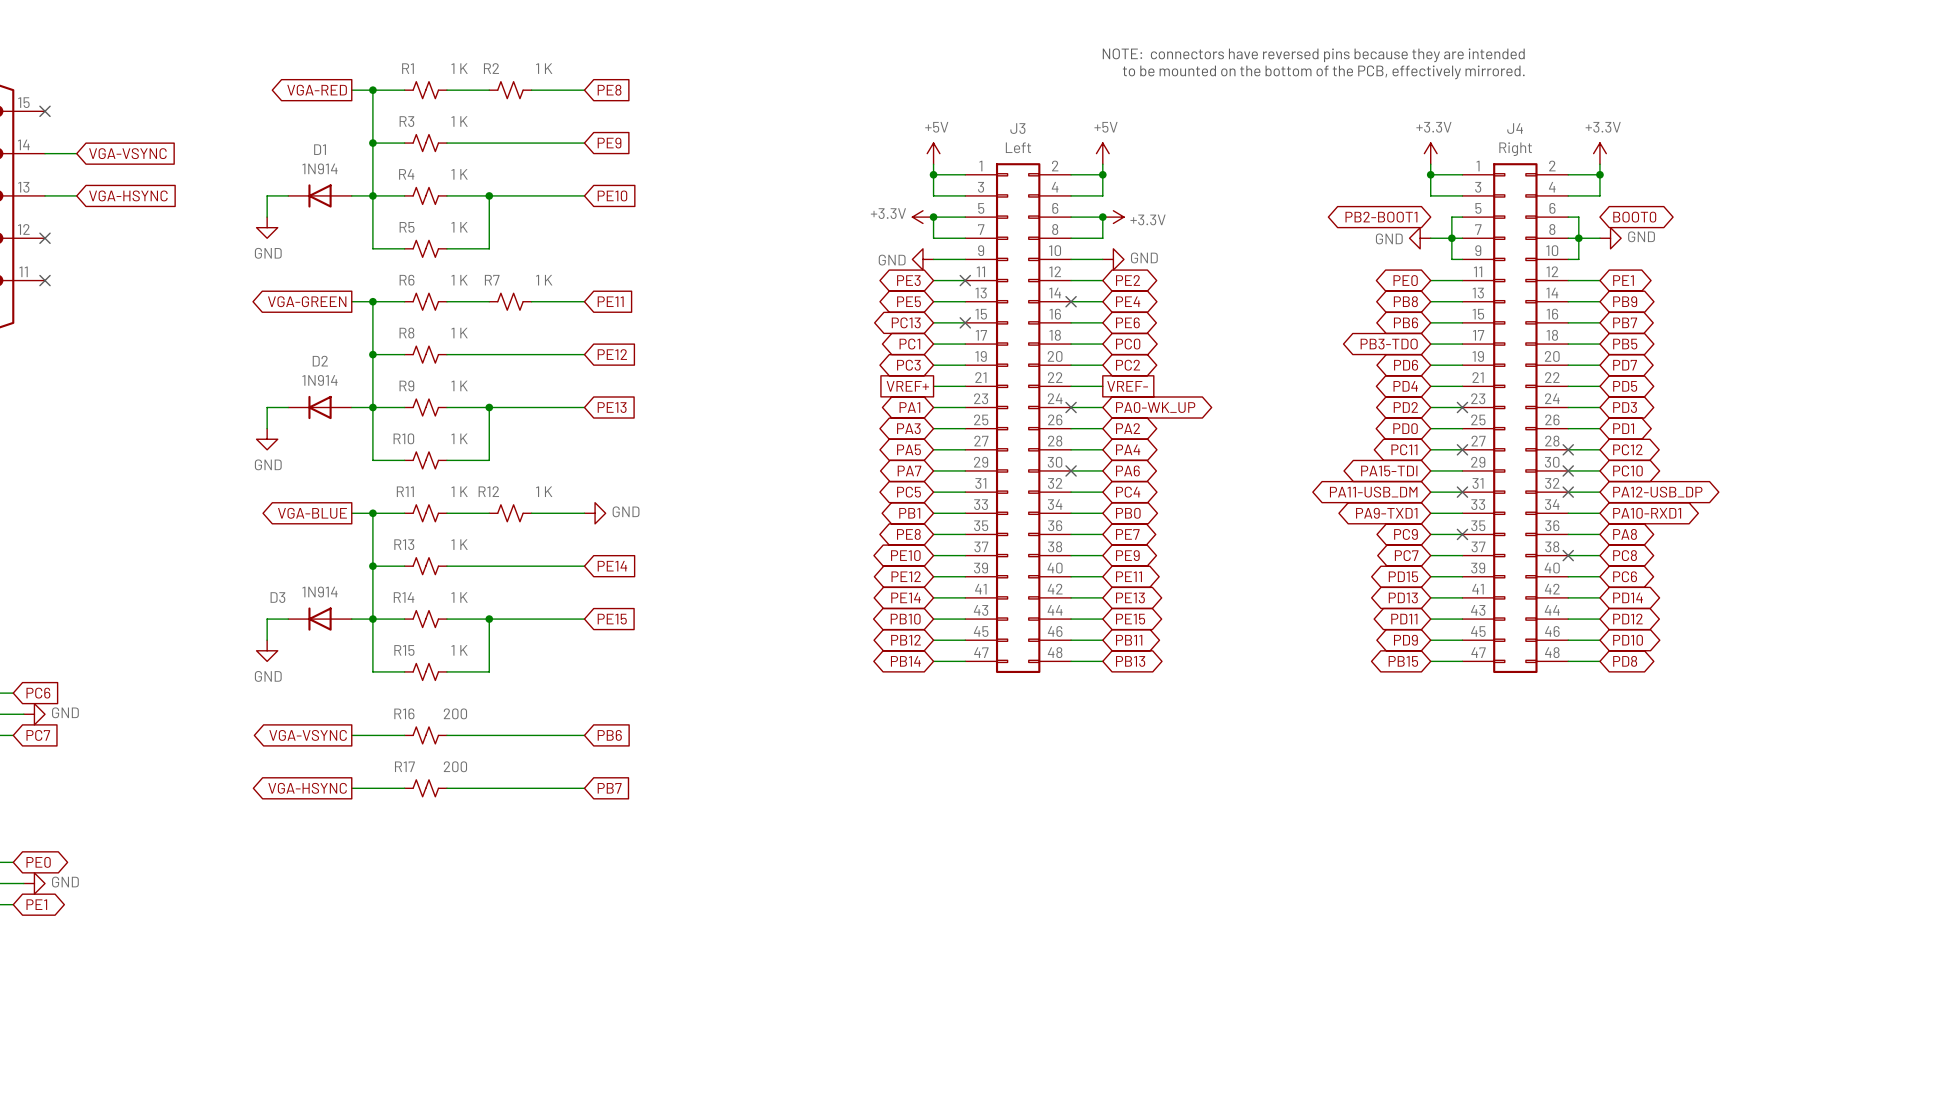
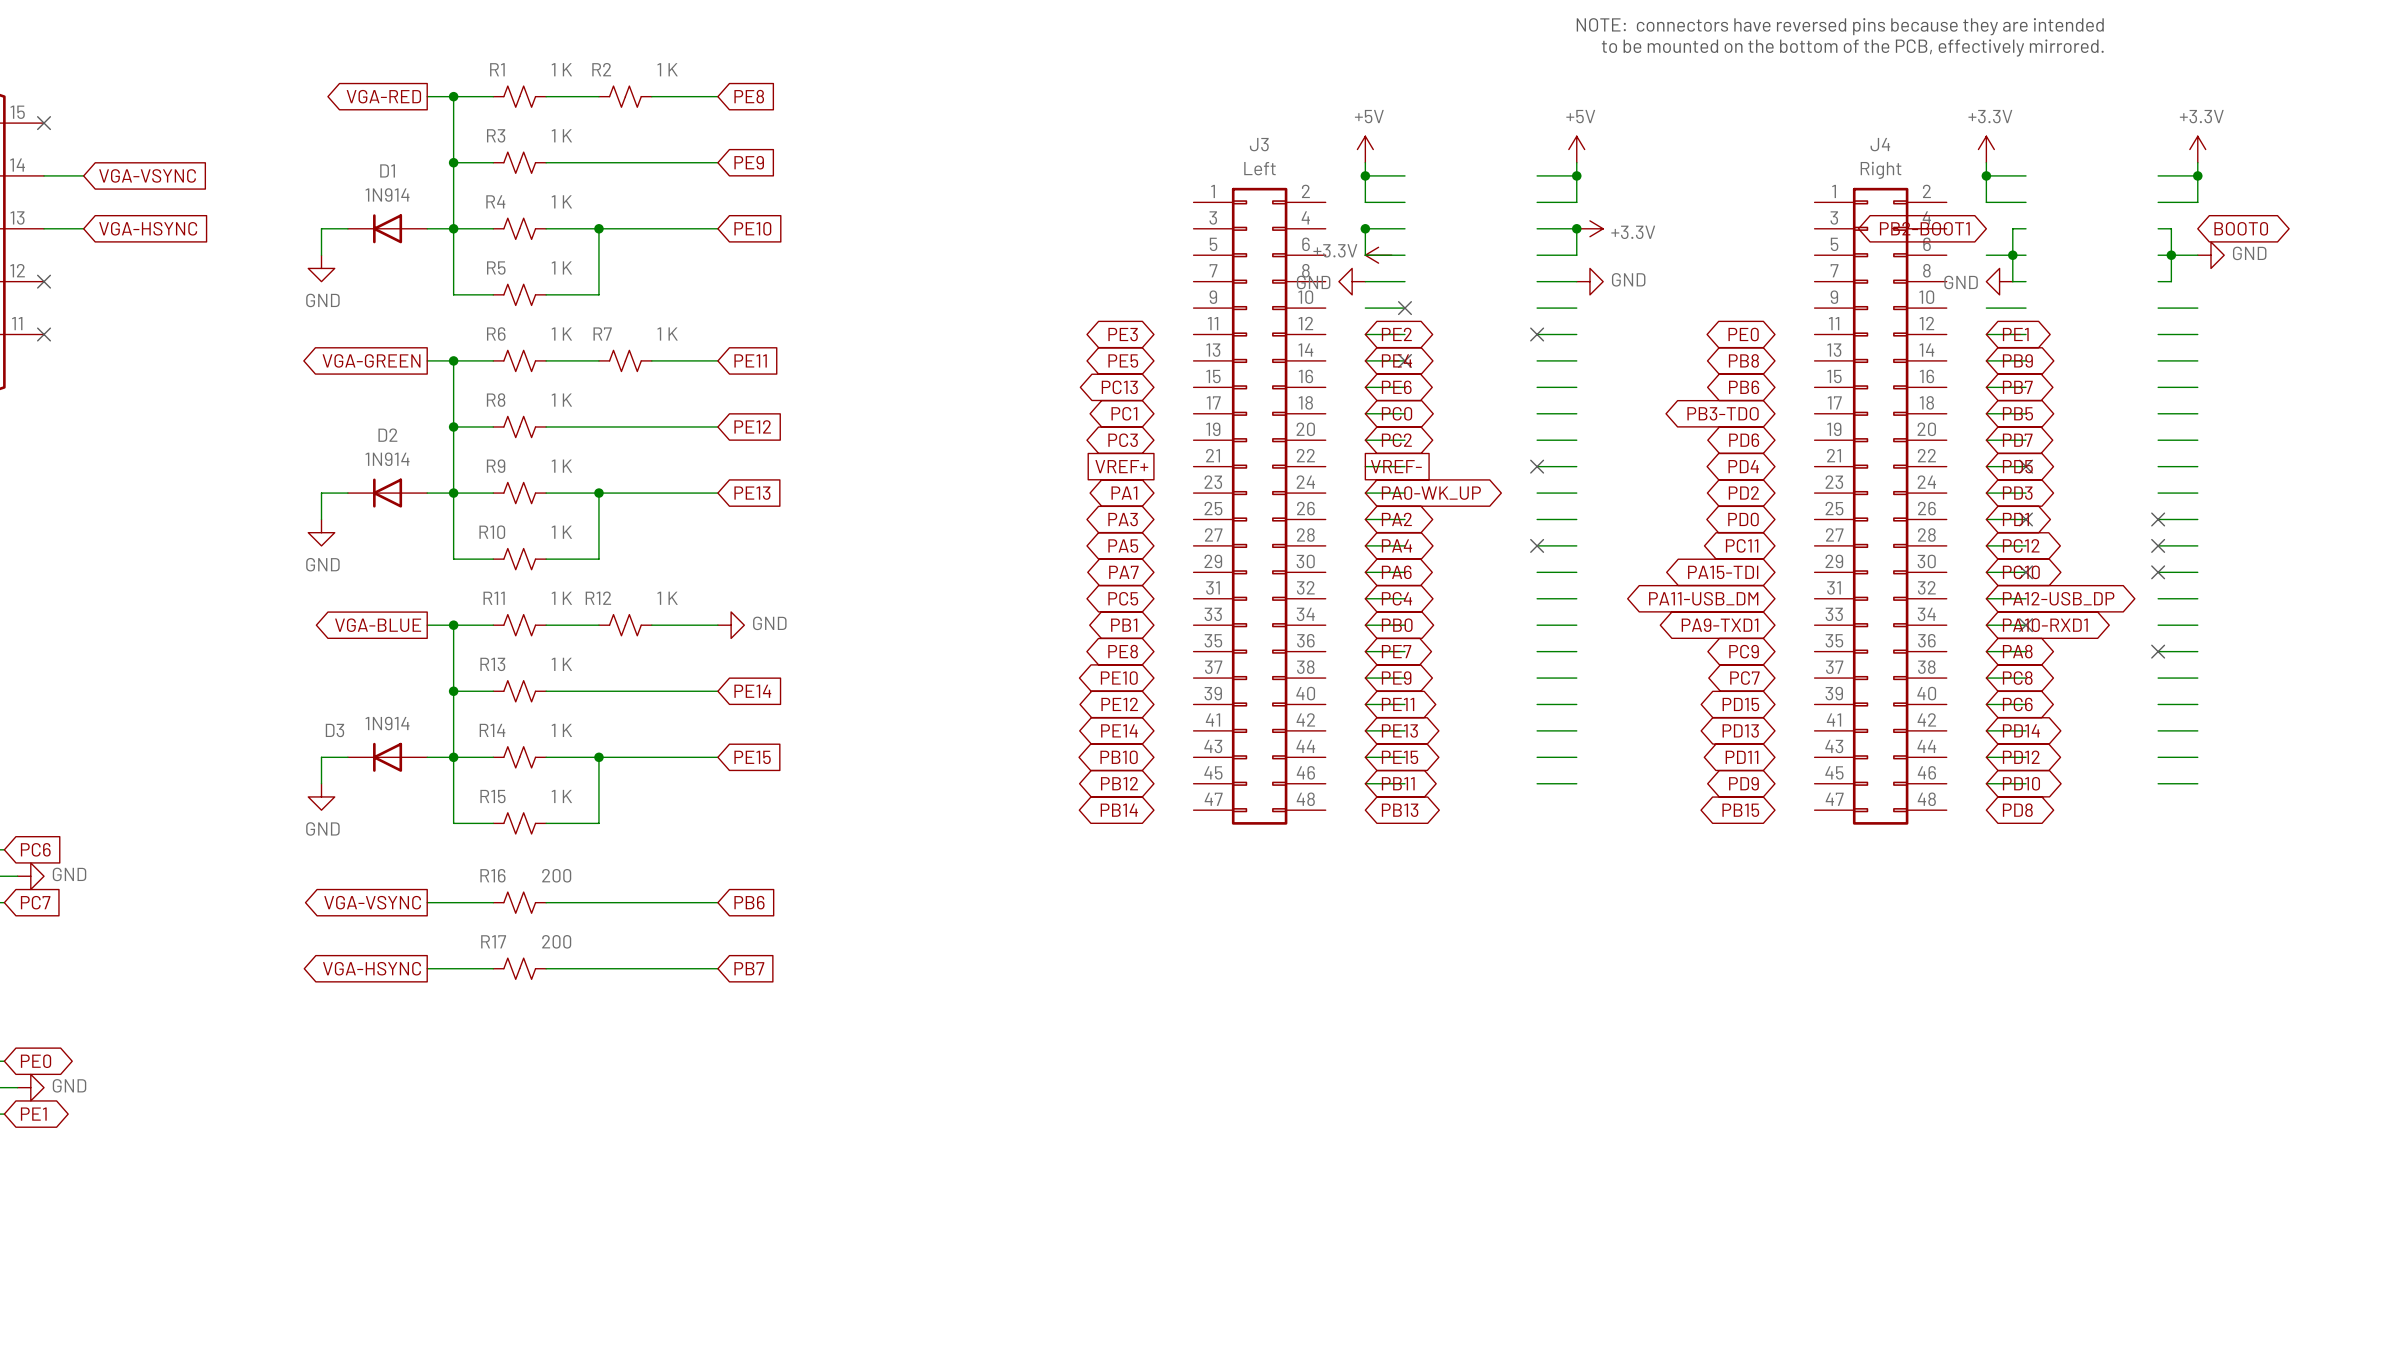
text position: NOTE: connectors have reversed pins because they are intended (1313, 55) -> NOTE: connectors have reversed pins because they are intended (1840, 26)
text position: to be mounted on the bottom of the PCB, effectively mirrored. (1323, 72) -> to be mounted on the bottom of the PCB, effectively mirrored. (1852, 47)
power symbol: none -> +5V (1576, 149)
power symbol: none -> +3.3V (2197, 149)
wire: none -> (1576, 162) (1576, 202) (1537, 202)
wire: none -> (2197, 162) (2197, 202) (2158, 202)
power symbol: +5V (933, 153) -> none
power symbol position: +5V (1102, 153) -> +5V (1365, 149)
junction: none -> (1365, 175)
wire: none -> (1537, 175) (1576, 175)
junction: none -> (1576, 175)
power symbol: +3.3V (1430, 153) -> none
power symbol position: +3.3V (1599, 153) -> +3.3V (1986, 149)
wire: none -> (2158, 175) (2197, 175)
junction: none -> (2197, 175)
wire: (933, 164) (933, 195) (965, 195) -> none
wire: (1430, 164) (1430, 195) (1462, 195) -> none
wire: (933, 174) (965, 174) -> (1365, 175) (1404, 175)
junction: (933, 174) -> none
wire: (1071, 174) (1102, 174) (1102, 195) (1071, 195) -> none
junction: (1102, 174) -> none
wire: (1430, 174) (1462, 174) -> (1986, 175) (2026, 175)
junction: (1430, 174) -> none
wire: (1568, 174) (1599, 174) (1599, 195) (1568, 195) -> none
wire: none -> (1986, 202) (2026, 202)
junction position: (1599, 174) -> (1986, 175)
junction: none -> (1365, 228)
junction: none -> (1576, 228)
power symbol: none -> +3.3V (1589, 228)
power symbol: +3.3V (922, 217) -> none
junction: (933, 217) -> none
wire: (965, 217) (933, 217) (933, 238) (965, 238) -> (1404, 228) (1365, 228) (1365, 255) (1404, 255)
wire: (1071, 217) (1102, 217) (1102, 238) (1071, 238) -> (1537, 228) (1576, 228) (1576, 255) (1537, 255)
junction: (1102, 217) -> none
power symbol rotation: 0° (1113, 217) -> 180° (1378, 255)
global label position: PB2-BOOT1 (1381, 217) -> PB2-BOOT1 (1924, 228)
wire: (1462, 217) (1451, 217) (1451, 259) (1462, 259) -> (2026, 228) (2012, 228) (2012, 281) (2026, 281)
wire: (1568, 217) (1578, 217) (1578, 259) (1568, 259) -> (2158, 228) (2171, 228) (2171, 281) (2158, 281)
junction: none -> (2012, 255)
global label position: BOOT0 (1634, 217) -> BOOT0 (2241, 228)
junction: none -> (2171, 255)
power symbol: none -> GND (2210, 255)
wire: none -> (1537, 281) (1576, 281)
power symbol: none -> GND (1589, 281)
power symbol: GND (1420, 238) -> none
wire: (1430, 238) (1462, 238) -> (1986, 255) (2026, 255)
junction: (1451, 238) -> none
wire: (1568, 238) (1599, 238) -> (2158, 255) (2197, 255)
junction: (1578, 238) -> none
power symbol rotation: 0° (1610, 238) -> 180° (1999, 281)
power symbol: GND (922, 259) -> none
wire: (933, 259) (965, 259) -> (1365, 281) (1404, 281)
wire: (1071, 259) (1102, 259) -> (1404, 308) (1365, 308)
power symbol rotation: 0° (1113, 259) -> 180° (1352, 281)
power symbol position: GND (1113, 259) -> GND (1352, 281)
no-connect mark: none -> (1404, 308)
wire: none -> (1537, 308) (1576, 308)
wire: none -> (2158, 308) (2197, 308)
wire: (933, 280) (965, 280) -> (1365, 202) (1404, 202)
no-connect mark: (965, 280) -> none
wire: (1071, 280) (1102, 280) -> (1404, 334) (1365, 334)
no-connect mark: none -> (1537, 334)
wire: (1430, 280) (1462, 280) -> (1986, 308) (2026, 308)
wire: (1568, 280) (1599, 280) -> (2026, 334) (1986, 334)
wire: none -> (2158, 334) (2197, 334)
wire: (933, 301) (965, 301) -> none
wire: (1071, 301) (1102, 301) -> (1404, 360) (1365, 360)
no-connect mark: (1071, 301) -> none
no-connect mark: none -> (1404, 360)
wire: (1430, 301) (1462, 301) -> (1537, 334) (1576, 334)
wire: (1568, 301) (1599, 301) -> (2026, 360) (1986, 360)
wire: none -> (2158, 360) (2197, 360)
wire: (933, 322) (965, 322) -> none
no-connect mark: (965, 322) -> none
wire: (1071, 322) (1102, 322) -> (1404, 387) (1365, 387)
wire: (1430, 322) (1462, 322) -> (1537, 360) (1576, 360)
wire: (1568, 322) (1599, 322) -> (2026, 387) (1986, 387)
wire: none -> (2158, 387) (2197, 387)
wire: (933, 344) (965, 344) -> none
wire: (1071, 344) (1102, 344) -> (1404, 413) (1365, 413)
wire: (1430, 344) (1462, 344) -> (1537, 387) (1576, 387)
wire: (1568, 344) (1599, 344) -> (2026, 413) (1986, 413)
wire: none -> (2158, 413) (2197, 413)
wire: (933, 365) (965, 365) -> none
wire: (1071, 365) (1102, 365) -> (1404, 440) (1365, 440)
wire: (1430, 365) (1462, 365) -> (1537, 413) (1576, 413)
wire: (1568, 365) (1599, 365) -> (2026, 440) (1986, 440)
wire: none -> (2158, 440) (2197, 440)
wire: (933, 386) (965, 386) -> none
wire: (1071, 386) (1102, 386) -> (1404, 466) (1365, 466)
no-connect mark: none -> (1537, 466)
wire: (1430, 386) (1462, 386) -> (1537, 440) (1576, 440)
wire: (1568, 386) (1599, 386) -> (2026, 466) (1986, 466)
no-connect mark: none -> (2026, 466)
wire: none -> (2158, 466) (2197, 466)
wire: (933, 407) (965, 407) -> none
wire: (1071, 407) (1102, 407) -> (1404, 493) (1365, 493)
no-connect mark: (1071, 407) -> none
wire: (1430, 407) (1462, 407) -> (1537, 466) (1576, 466)
no-connect mark: (1462, 407) -> none
wire: (1568, 407) (1599, 407) -> (2026, 493) (1986, 493)
wire: none -> (2158, 493) (2197, 493)
wire: (933, 428) (965, 428) -> none
wire: (1071, 428) (1102, 428) -> (1404, 519) (1365, 519)
wire: (1430, 428) (1462, 428) -> (1537, 493) (1576, 493)
wire: (1568, 428) (1599, 428) -> (2026, 519) (1986, 519)
no-connect mark: none -> (2026, 519)
wire: none -> (2158, 519) (2197, 519)
no-connect mark: none -> (2158, 519)
wire: (933, 449) (965, 449) -> none
wire: (1071, 449) (1102, 449) -> (1404, 545) (1365, 545)
no-connect mark: none -> (1537, 545)
wire: (1430, 449) (1462, 449) -> (1537, 519) (1576, 519)
no-connect mark: (1462, 449) -> none
wire: (1568, 449) (1599, 449) -> (2026, 545) (1986, 545)
no-connect mark: (1568, 449) -> none
wire: none -> (2158, 545) (2197, 545)
no-connect mark: none -> (2158, 545)
wire: (933, 470) (965, 470) -> none
wire: (1071, 470) (1102, 470) -> (1404, 572) (1365, 572)
no-connect mark: (1071, 470) -> none
wire: (1430, 470) (1462, 470) -> (1537, 545) (1576, 545)
wire: (1568, 470) (1599, 470) -> (2026, 572) (1986, 572)
no-connect mark: (1568, 470) -> none
no-connect mark: none -> (2026, 572)
wire: none -> (2158, 572) (2197, 572)
no-connect mark: none -> (2158, 572)
wire: (933, 492) (965, 492) -> none
wire: (1071, 492) (1102, 492) -> (1404, 598) (1365, 598)
wire: (1430, 492) (1462, 492) -> (1537, 572) (1576, 572)
no-connect mark: (1462, 492) -> none
wire: (1568, 492) (1599, 492) -> (2026, 598) (1986, 598)
no-connect mark: (1568, 492) -> none
wire: none -> (2158, 598) (2197, 598)
wire: (933, 513) (965, 513) -> none
wire: (1071, 513) (1102, 513) -> (1404, 625) (1365, 625)
wire: (1430, 513) (1462, 513) -> (1537, 598) (1576, 598)
wire: (1568, 513) (1599, 513) -> (2026, 625) (1986, 625)
no-connect mark: none -> (2026, 625)
wire: none -> (2158, 625) (2197, 625)
wire: (933, 534) (965, 534) -> none
wire: (1071, 534) (1102, 534) -> (1404, 651) (1365, 651)
wire: (1430, 534) (1462, 534) -> (1537, 625) (1576, 625)
no-connect mark: (1462, 534) -> none
wire: (1568, 534) (1599, 534) -> (2026, 651) (1986, 651)
wire: none -> (2158, 651) (2197, 651)
no-connect mark: none -> (2158, 651)
wire: (933, 555) (965, 555) -> none
wire: (1071, 555) (1102, 555) -> (1404, 678) (1365, 678)
wire: (1430, 555) (1462, 555) -> (1537, 651) (1576, 651)
wire: (1568, 555) (1599, 555) -> (2026, 678) (1986, 678)
no-connect mark: (1568, 555) -> none
wire: none -> (2158, 678) (2197, 678)
wire: (933, 576) (965, 576) -> none
wire: (1071, 576) (1102, 576) -> (1404, 704) (1365, 704)
wire: (1430, 576) (1462, 576) -> (1537, 678) (1576, 678)
wire: (1568, 576) (1599, 576) -> (2026, 704) (1986, 704)
wire: none -> (2158, 704) (2197, 704)
wire: (933, 597) (965, 597) -> none
wire: (1071, 597) (1102, 597) -> (1404, 730) (1365, 730)
wire: (1430, 597) (1462, 597) -> (1537, 704) (1576, 704)
wire: (1568, 597) (1599, 597) -> (2026, 730) (1986, 730)
wire: none -> (2158, 730) (2197, 730)
wire: (933, 619) (965, 619) -> none
wire: (1071, 619) (1102, 619) -> (1404, 757) (1365, 757)
wire: (1430, 619) (1462, 619) -> (1537, 730) (1576, 730)
wire: (1568, 619) (1599, 619) -> (2026, 757) (1986, 757)
wire: none -> (2158, 757) (2197, 757)
wire: (933, 640) (965, 640) -> none
wire: (1071, 640) (1102, 640) -> (1404, 783) (1365, 783)
wire: (1430, 640) (1462, 640) -> (1537, 757) (1576, 757)
wire: (1568, 640) (1599, 640) -> (2026, 783) (1986, 783)
wire: (933, 661) (965, 661) -> none
wire: (1071, 661) (1102, 661) -> (1537, 783) (1576, 783)
wire: (1430, 661) (1462, 661) -> none
wire: (1568, 661) (1599, 661) -> (2158, 783) (2197, 783)

